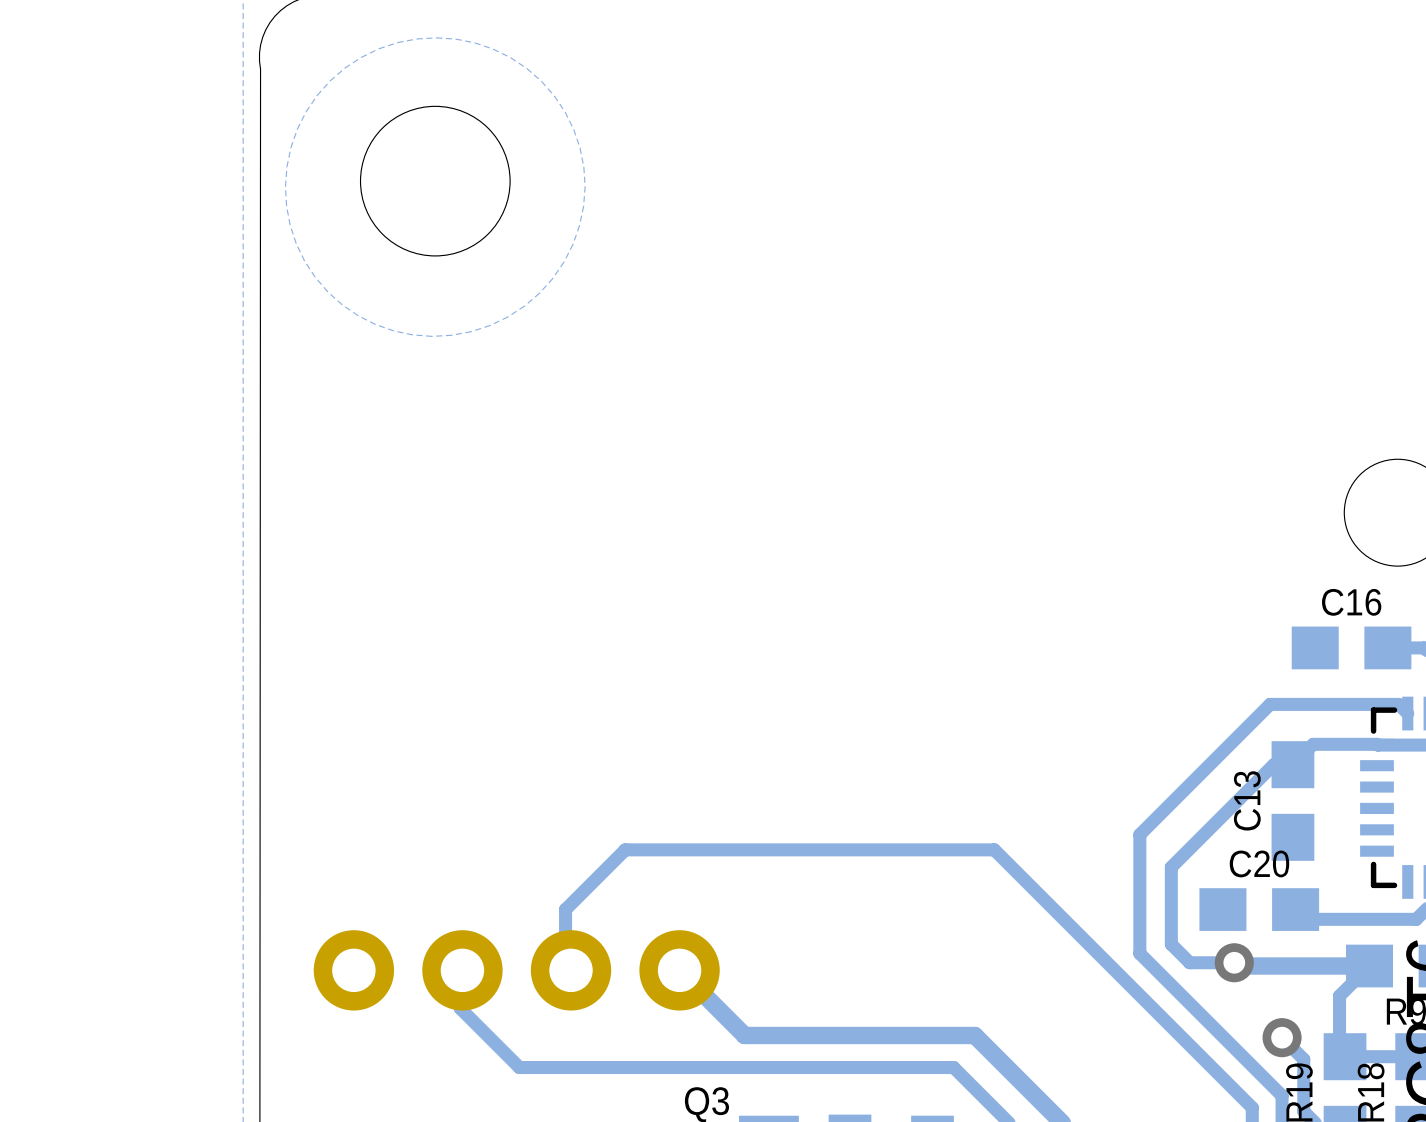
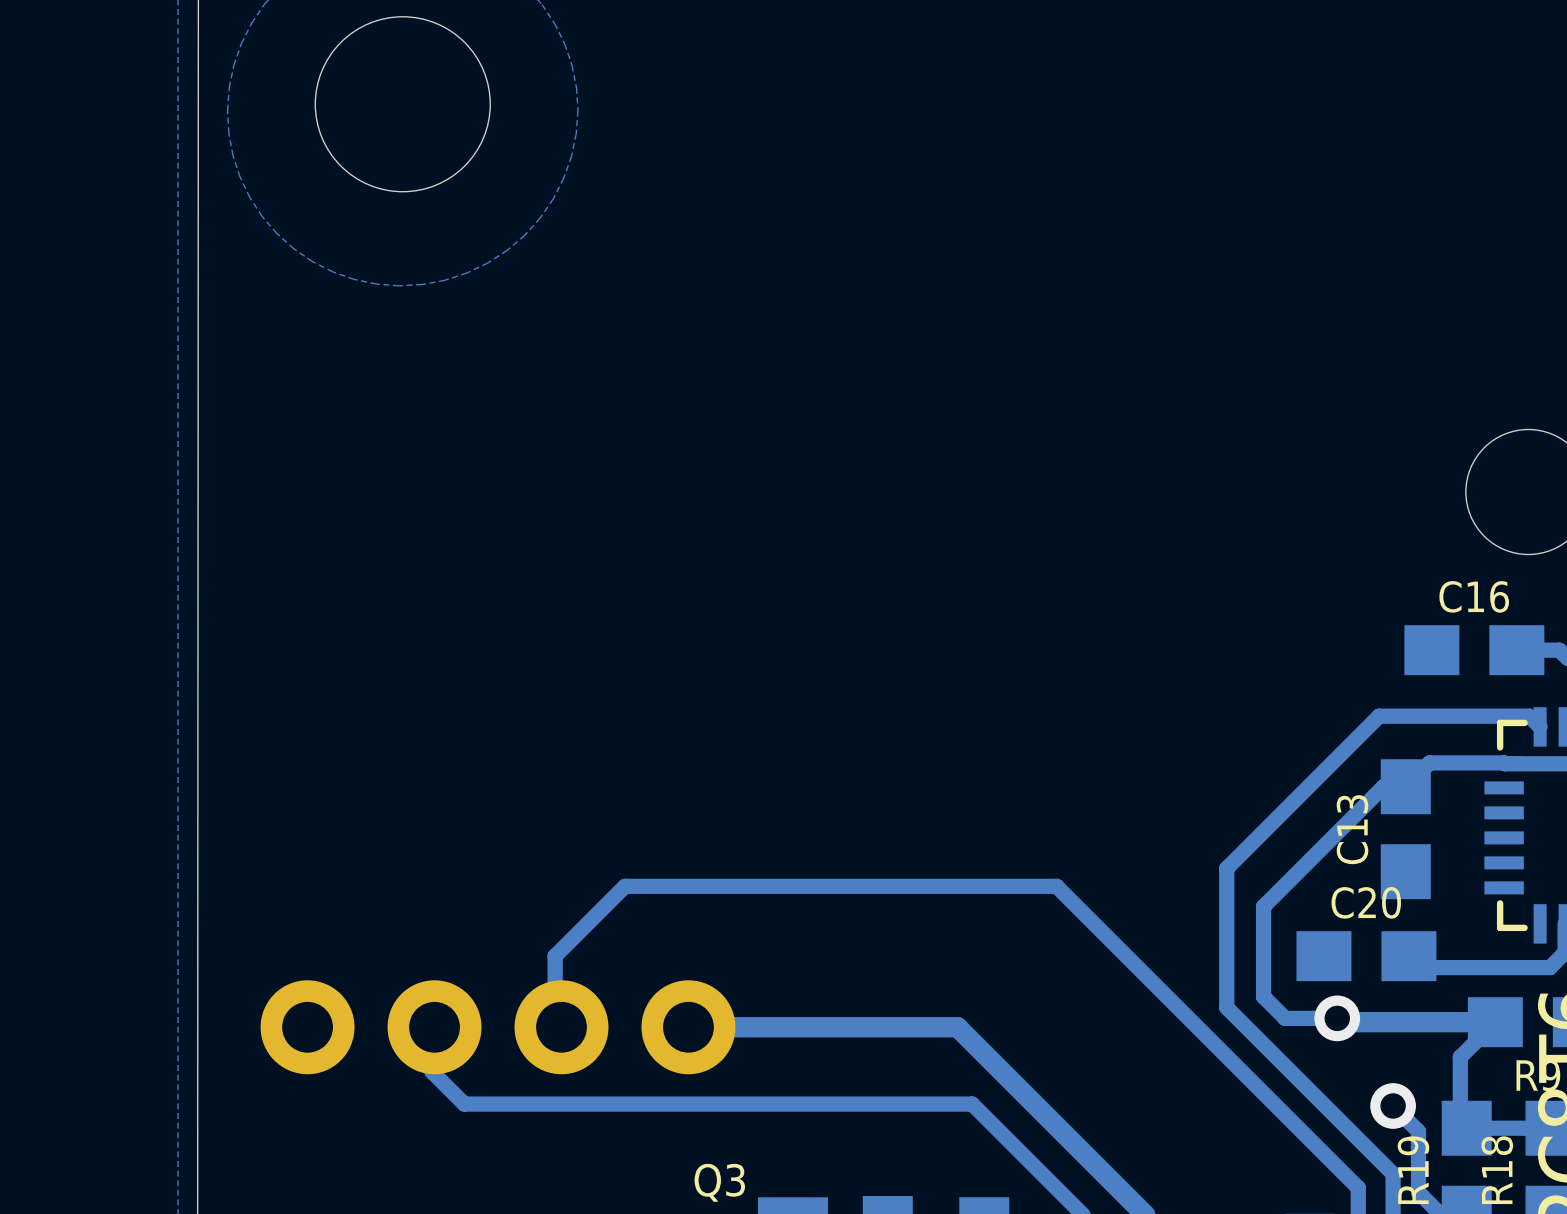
track: (679, 970) (744, 1035) (974, 1035) -> (688, 1027) (957, 1027) (1033, 1103)
track: (487, 1036) (519, 1067) (953, 1067) -> (464, 1104) (972, 1104) (1009, 1140)

